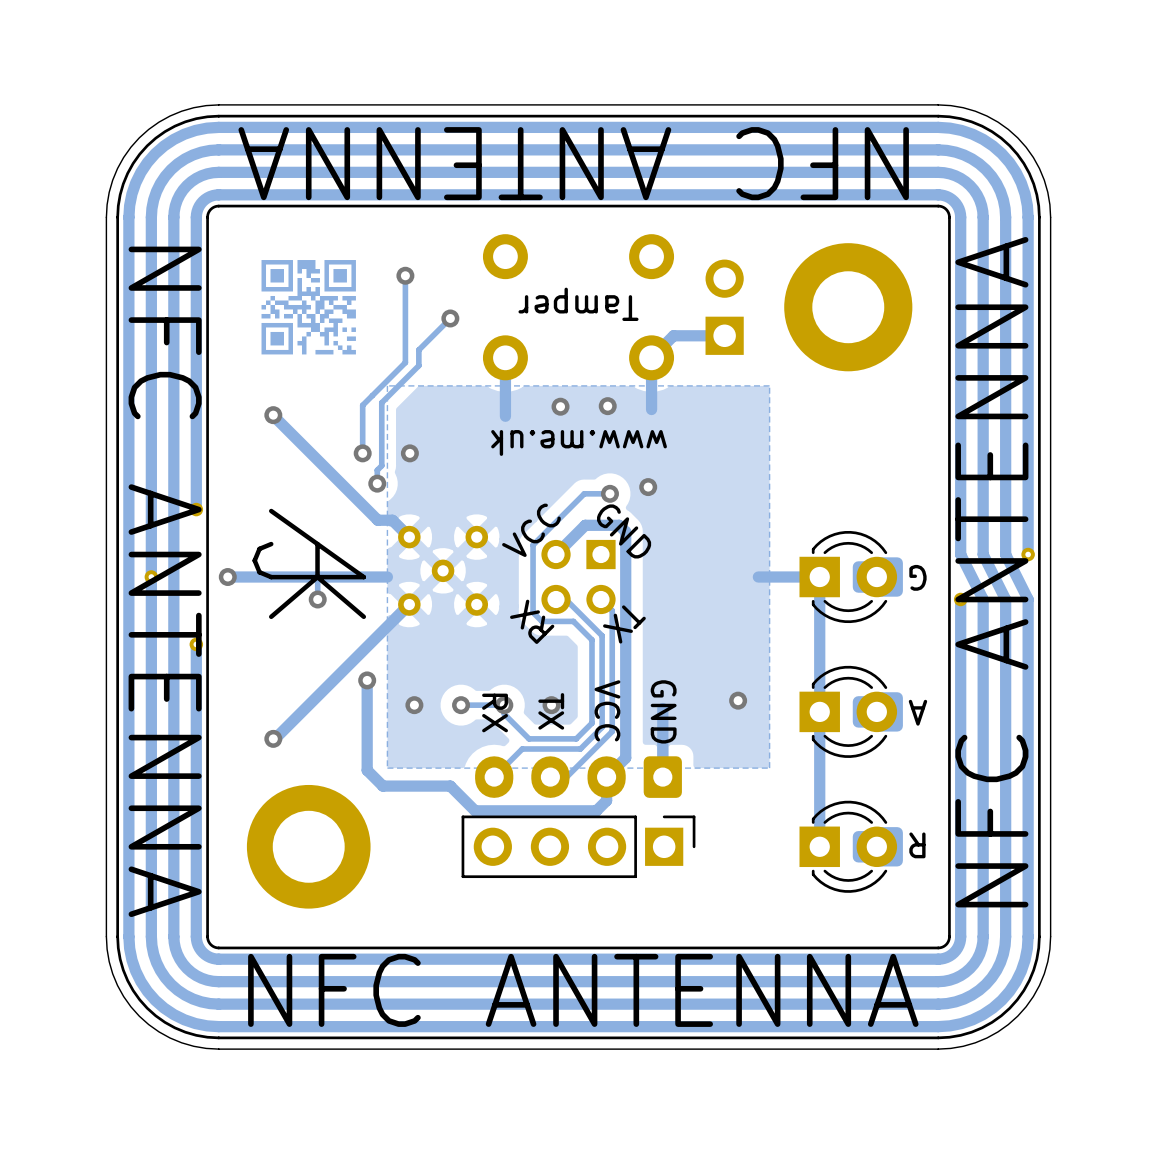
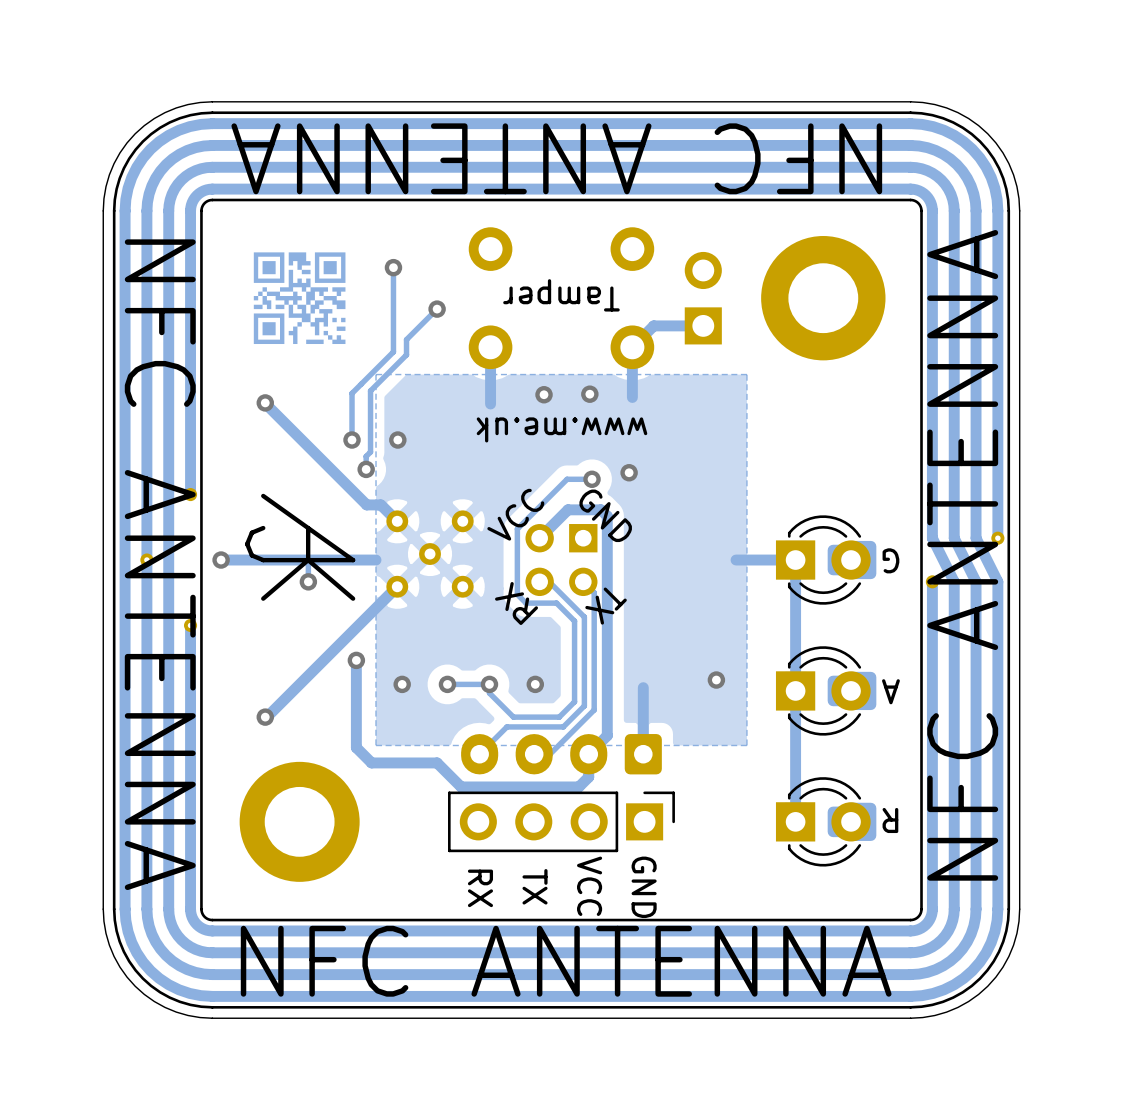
text position: VCC (607, 710) -> VCC (589, 886)
text position: TX (551, 711) -> TX (535, 886)
text position: GND (663, 711) -> GND (644, 887)
text position: RX (495, 712) -> RX (480, 888)

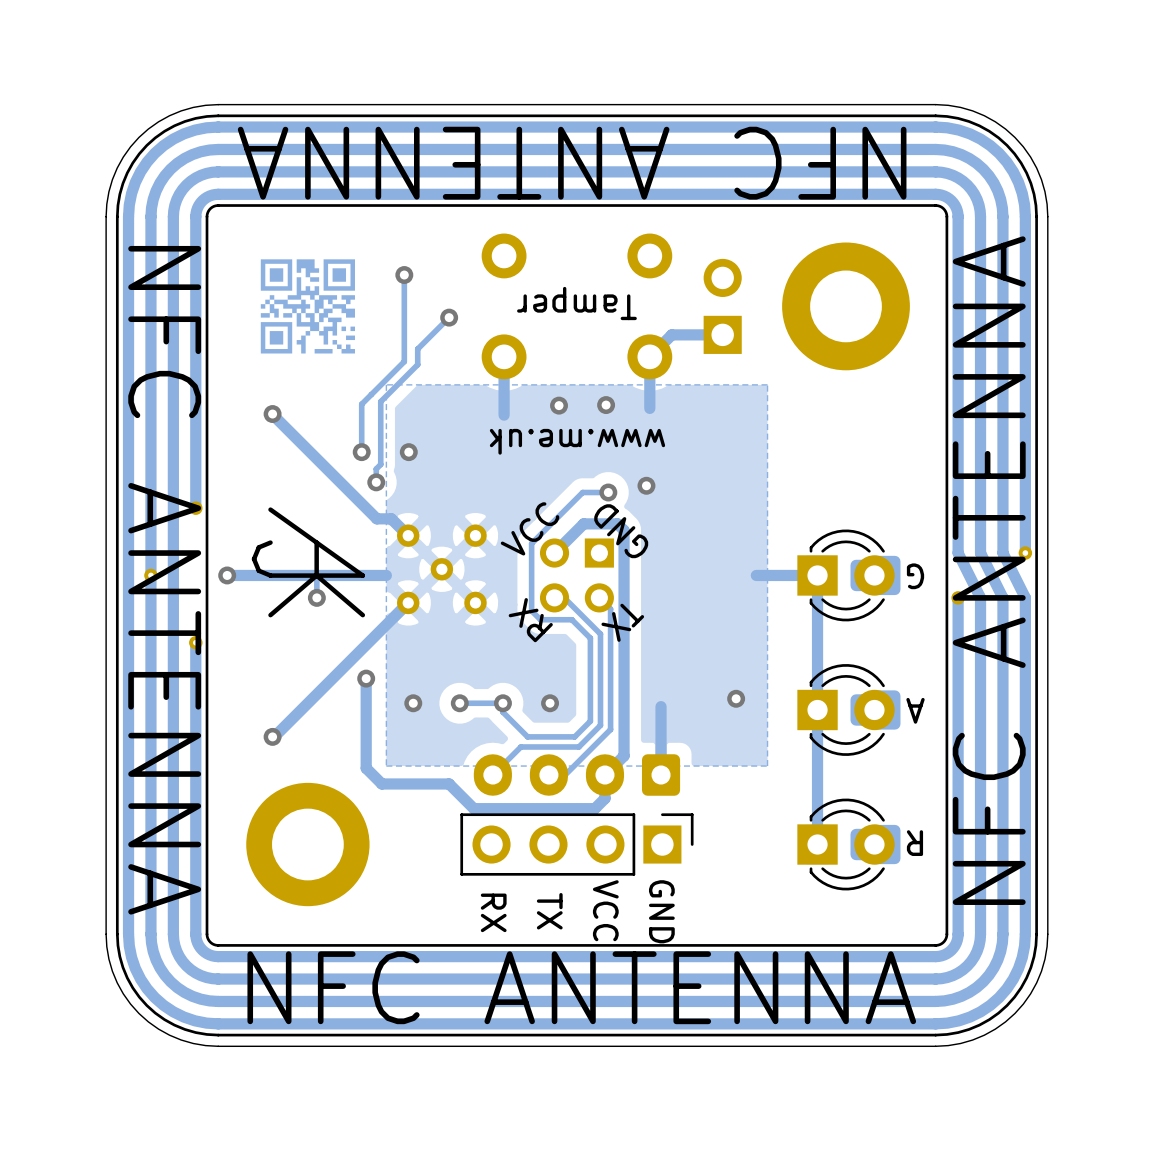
text rotation: 0° (605, 515) -> 180° (621, 531)

